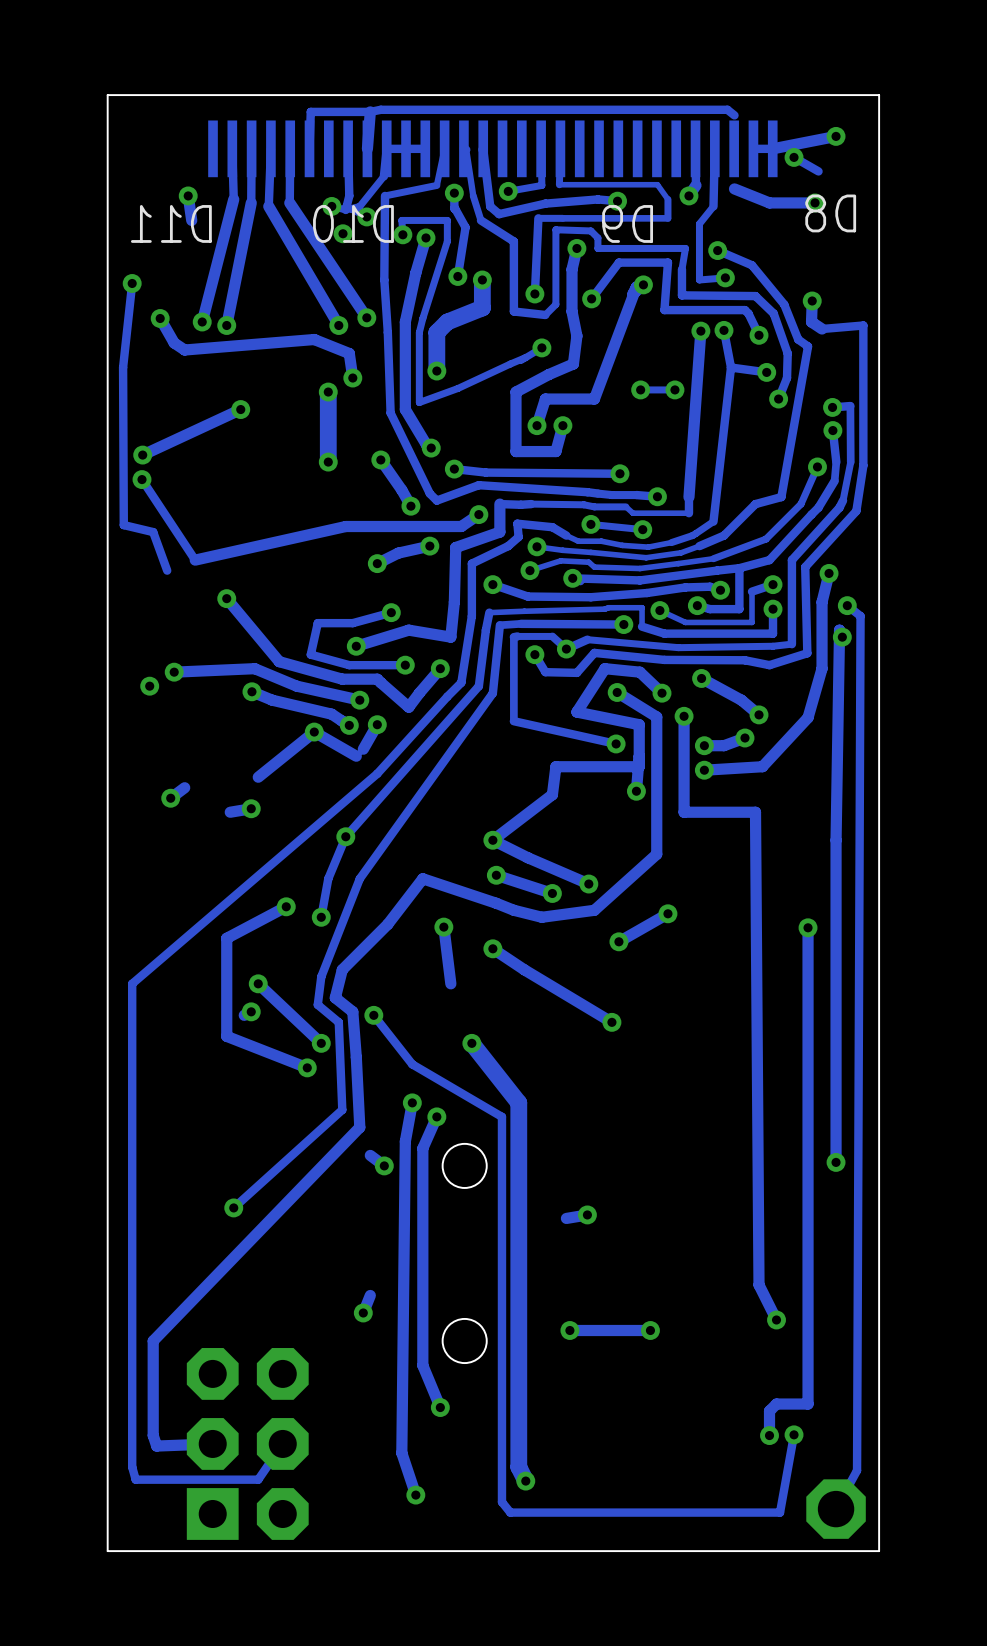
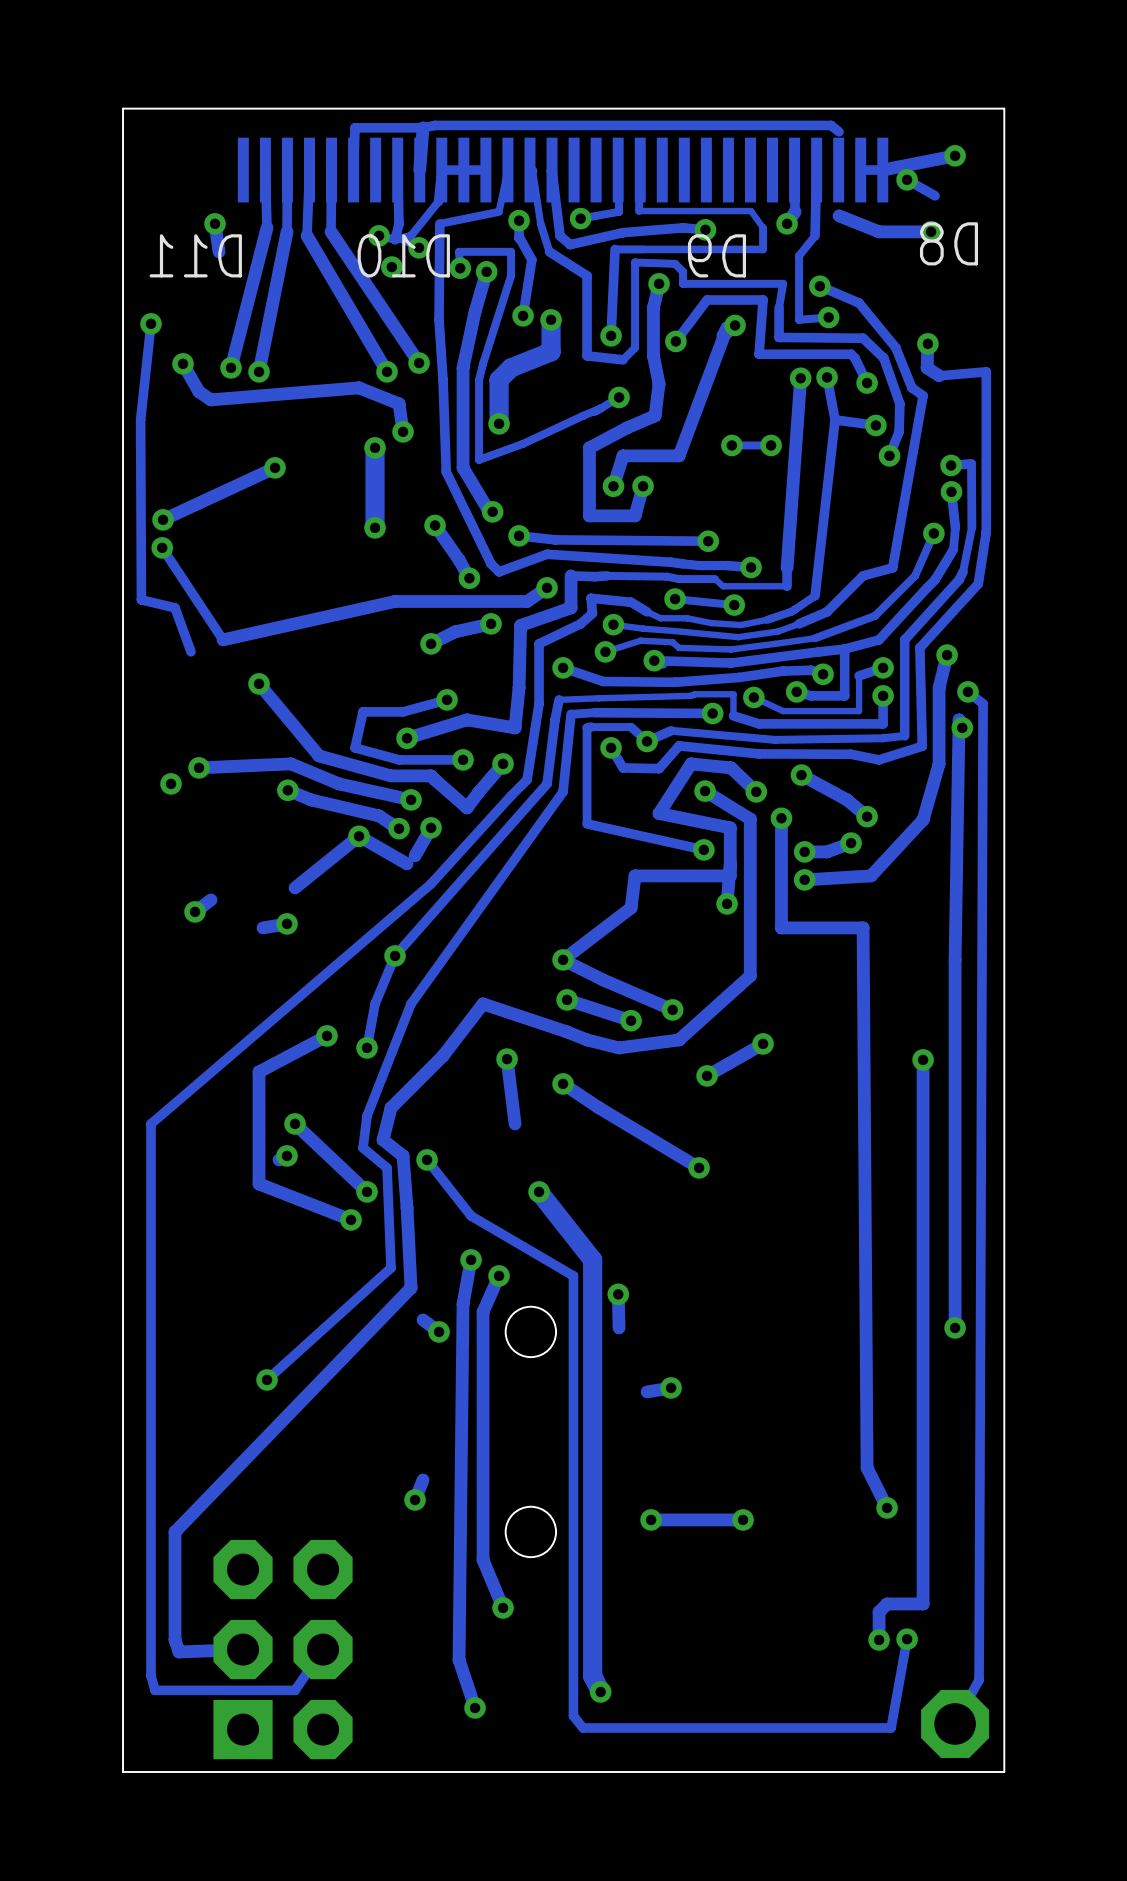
track: none -> (618, 1294) (619, 1327)
via: none -> (618, 1294)

